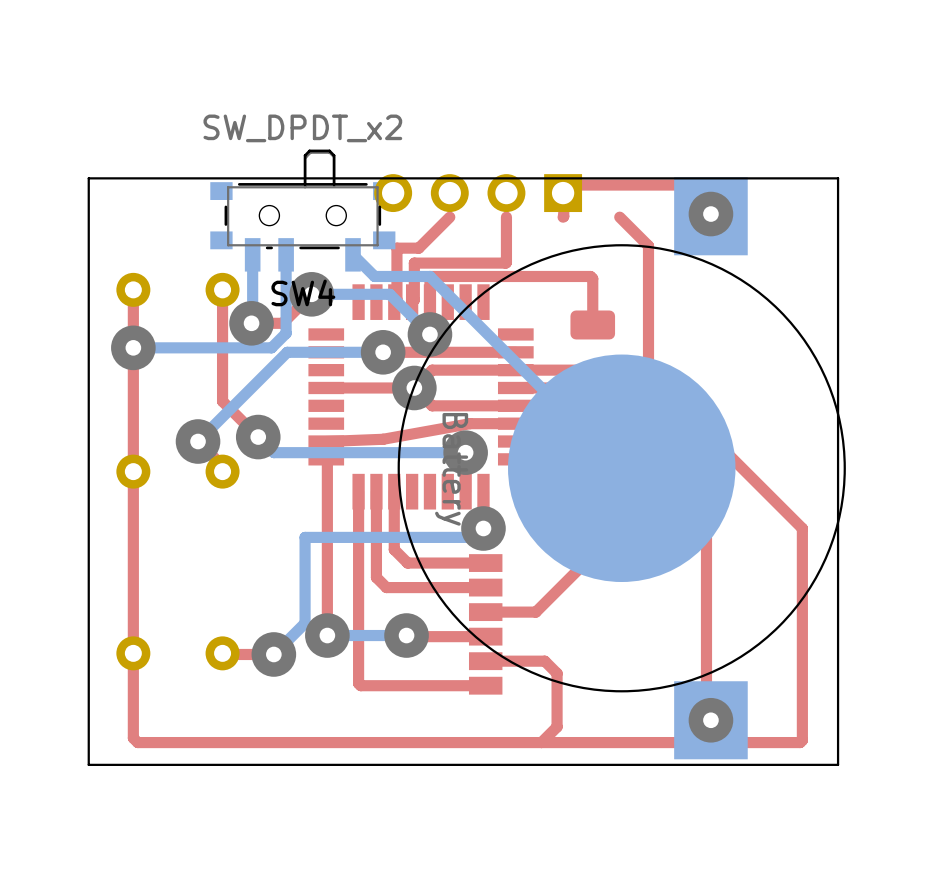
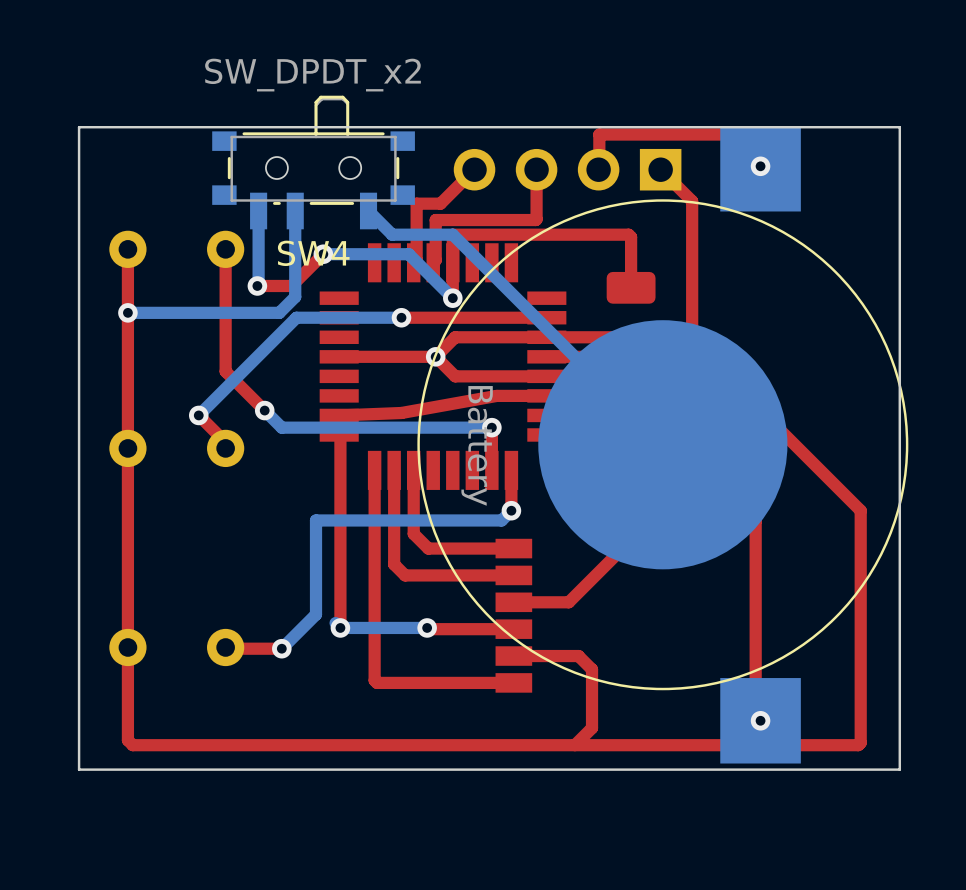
via size: [688, 191, 734, 237] -> [750, 156, 771, 177]
part position: (478, 193) -> (567, 169)
via size: [289, 272, 335, 317] -> [313, 244, 334, 265]
via size: [229, 301, 274, 346] -> [247, 276, 268, 296]
via size: [407, 312, 453, 357] -> [443, 288, 463, 308]
via size: [111, 325, 156, 371] -> [118, 303, 138, 323]
via size: [360, 330, 406, 375] -> [391, 307, 412, 328]
via size: [392, 365, 437, 411] -> [425, 347, 446, 367]
via size: [235, 414, 281, 460] -> [254, 400, 275, 421]
via size: [175, 419, 221, 464] -> [188, 405, 209, 426]
via size: [443, 430, 488, 475] -> [482, 417, 502, 438]
via size: [461, 506, 506, 551] -> [501, 500, 522, 521]
via size: [305, 613, 350, 658] -> [330, 618, 351, 638]
via size: [384, 613, 429, 658] -> [417, 618, 437, 638]
via size: [251, 632, 297, 677] -> [272, 638, 292, 659]
via size: [688, 697, 734, 743] -> [750, 711, 771, 731]

